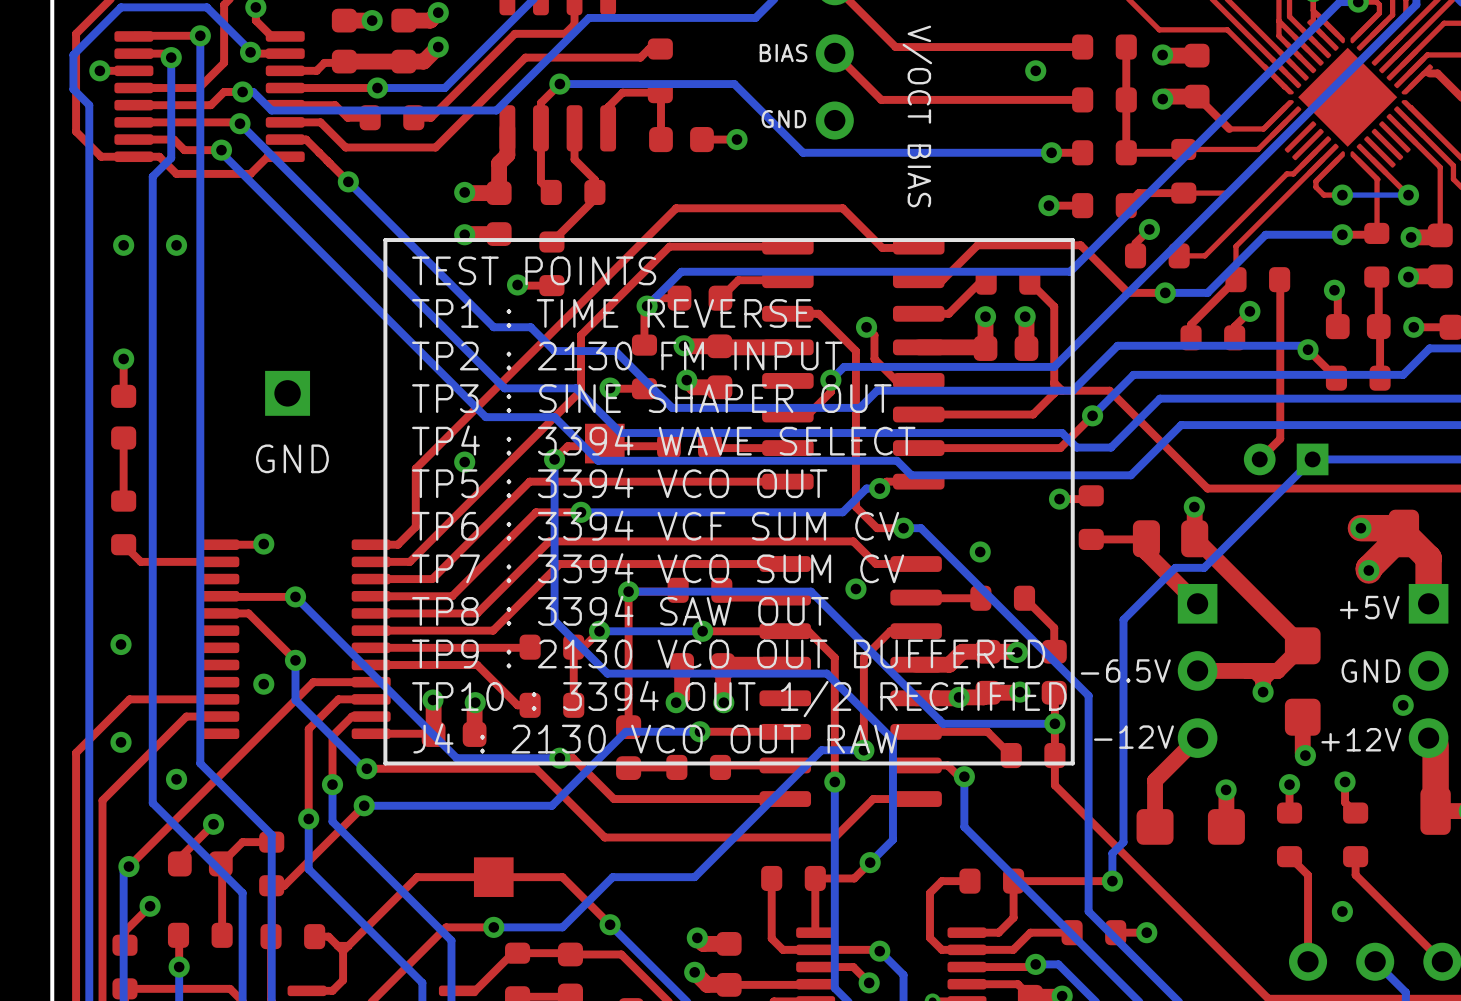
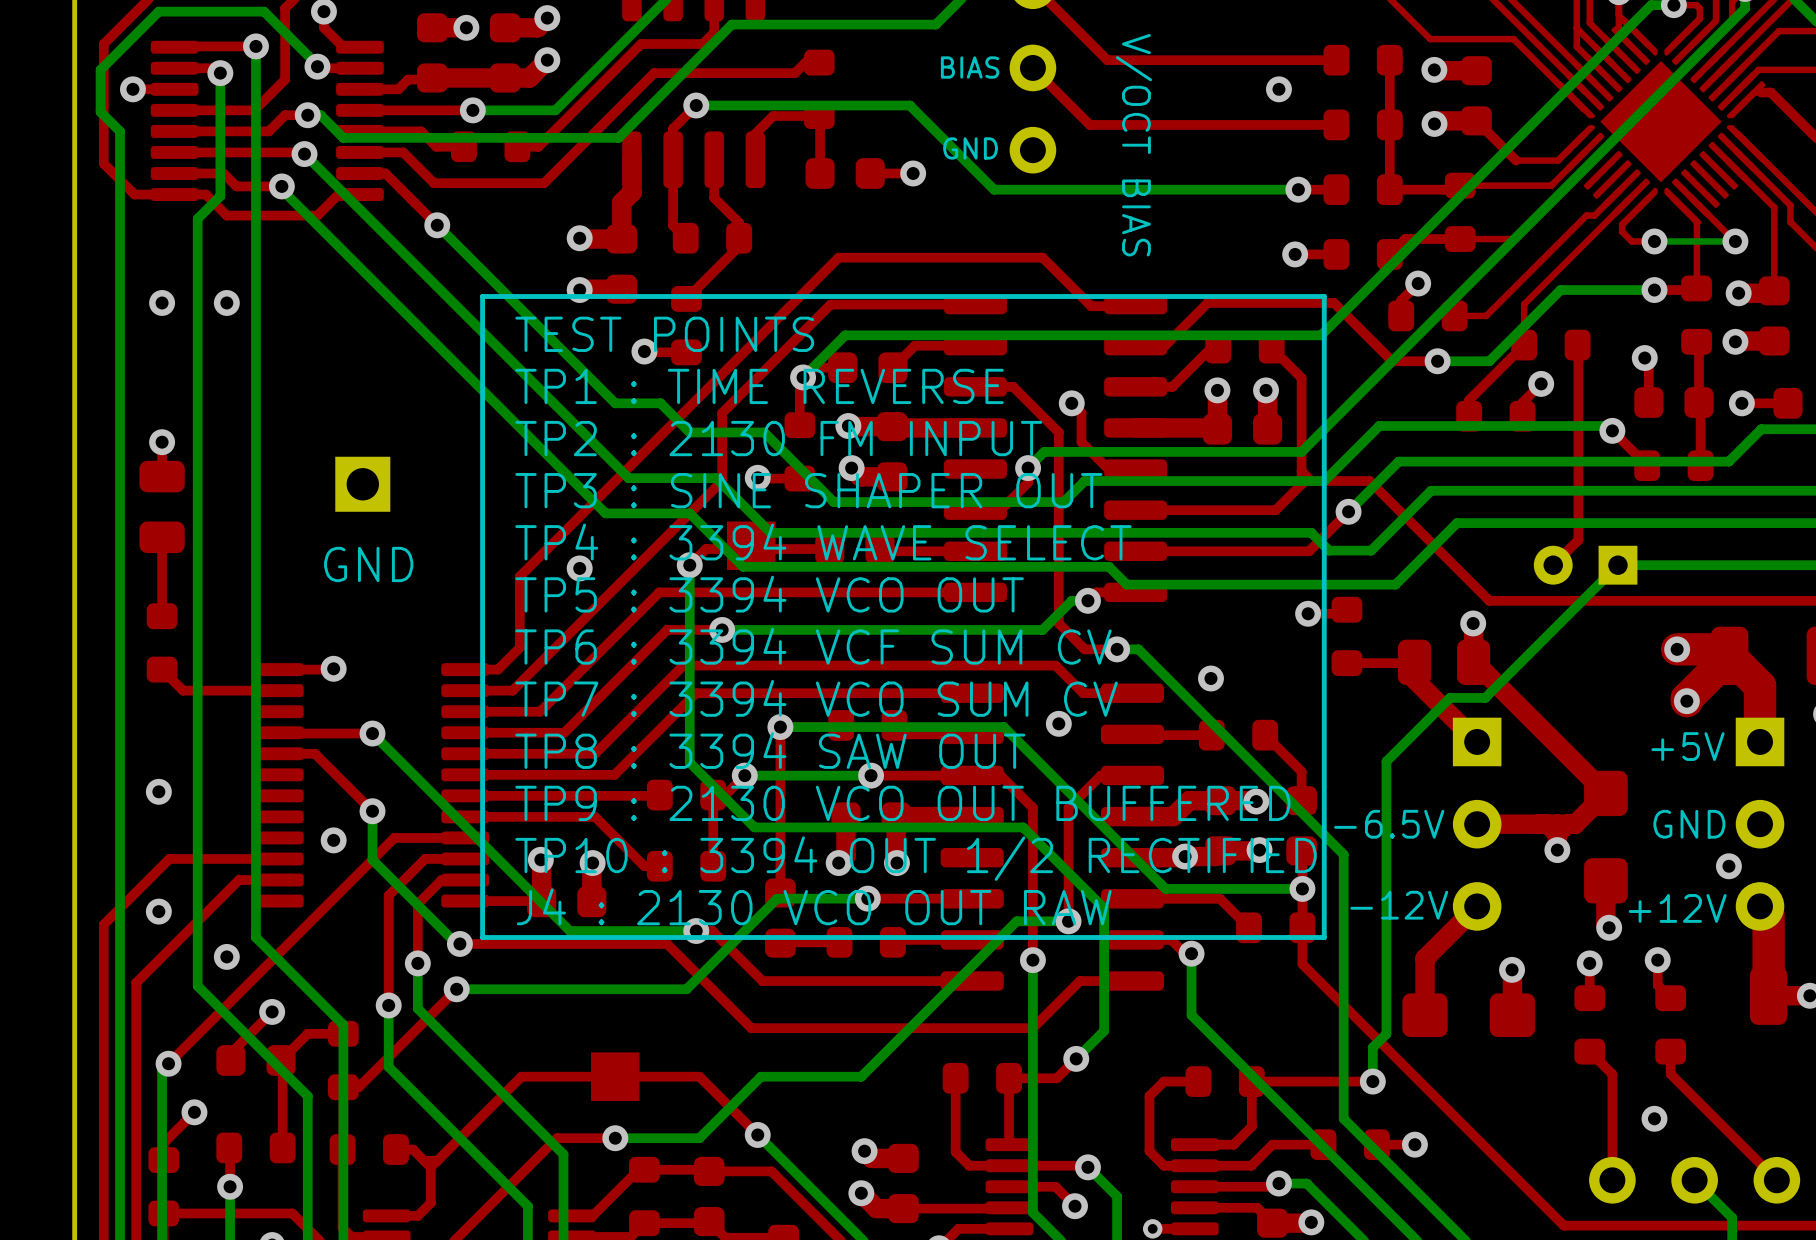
part footprint: [111, 384, 137, 450] -> [139, 460, 185, 554]

